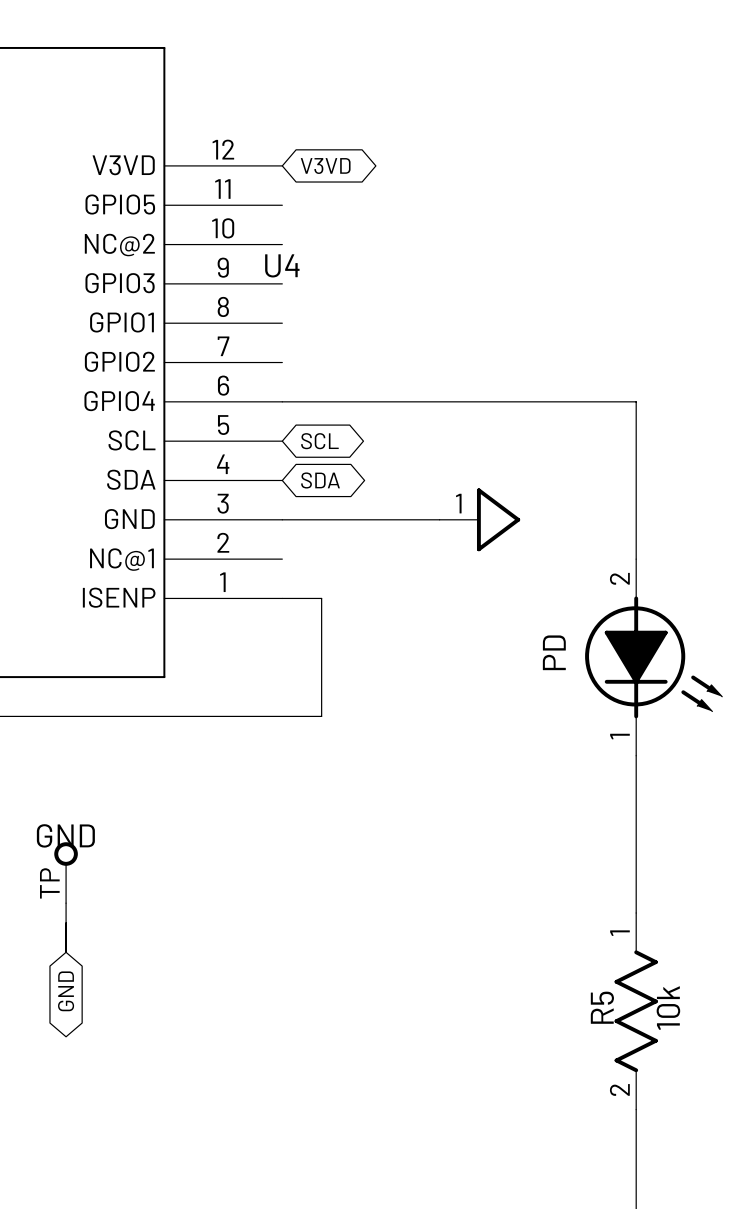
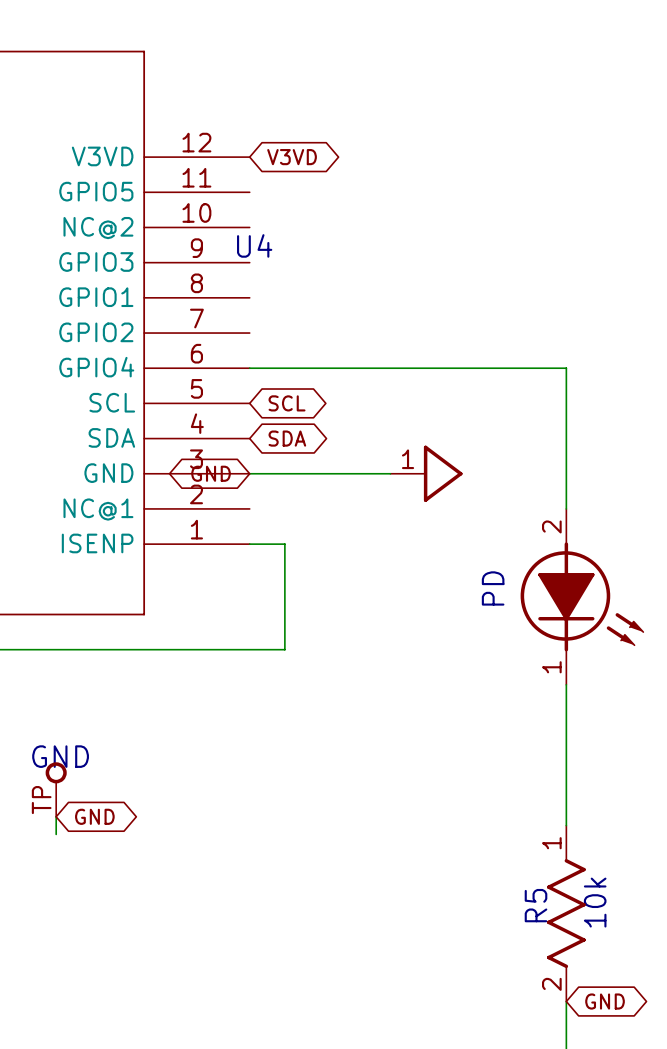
global label: none -> GND (211, 473)
wire: (66, 922) (66, 952) -> none
global label rotation: 0° (66, 991) -> 90° counterclockwise (94, 816)
global label position: GND (66, 991) -> GND (94, 816)
global label: none -> GND (605, 1001)

